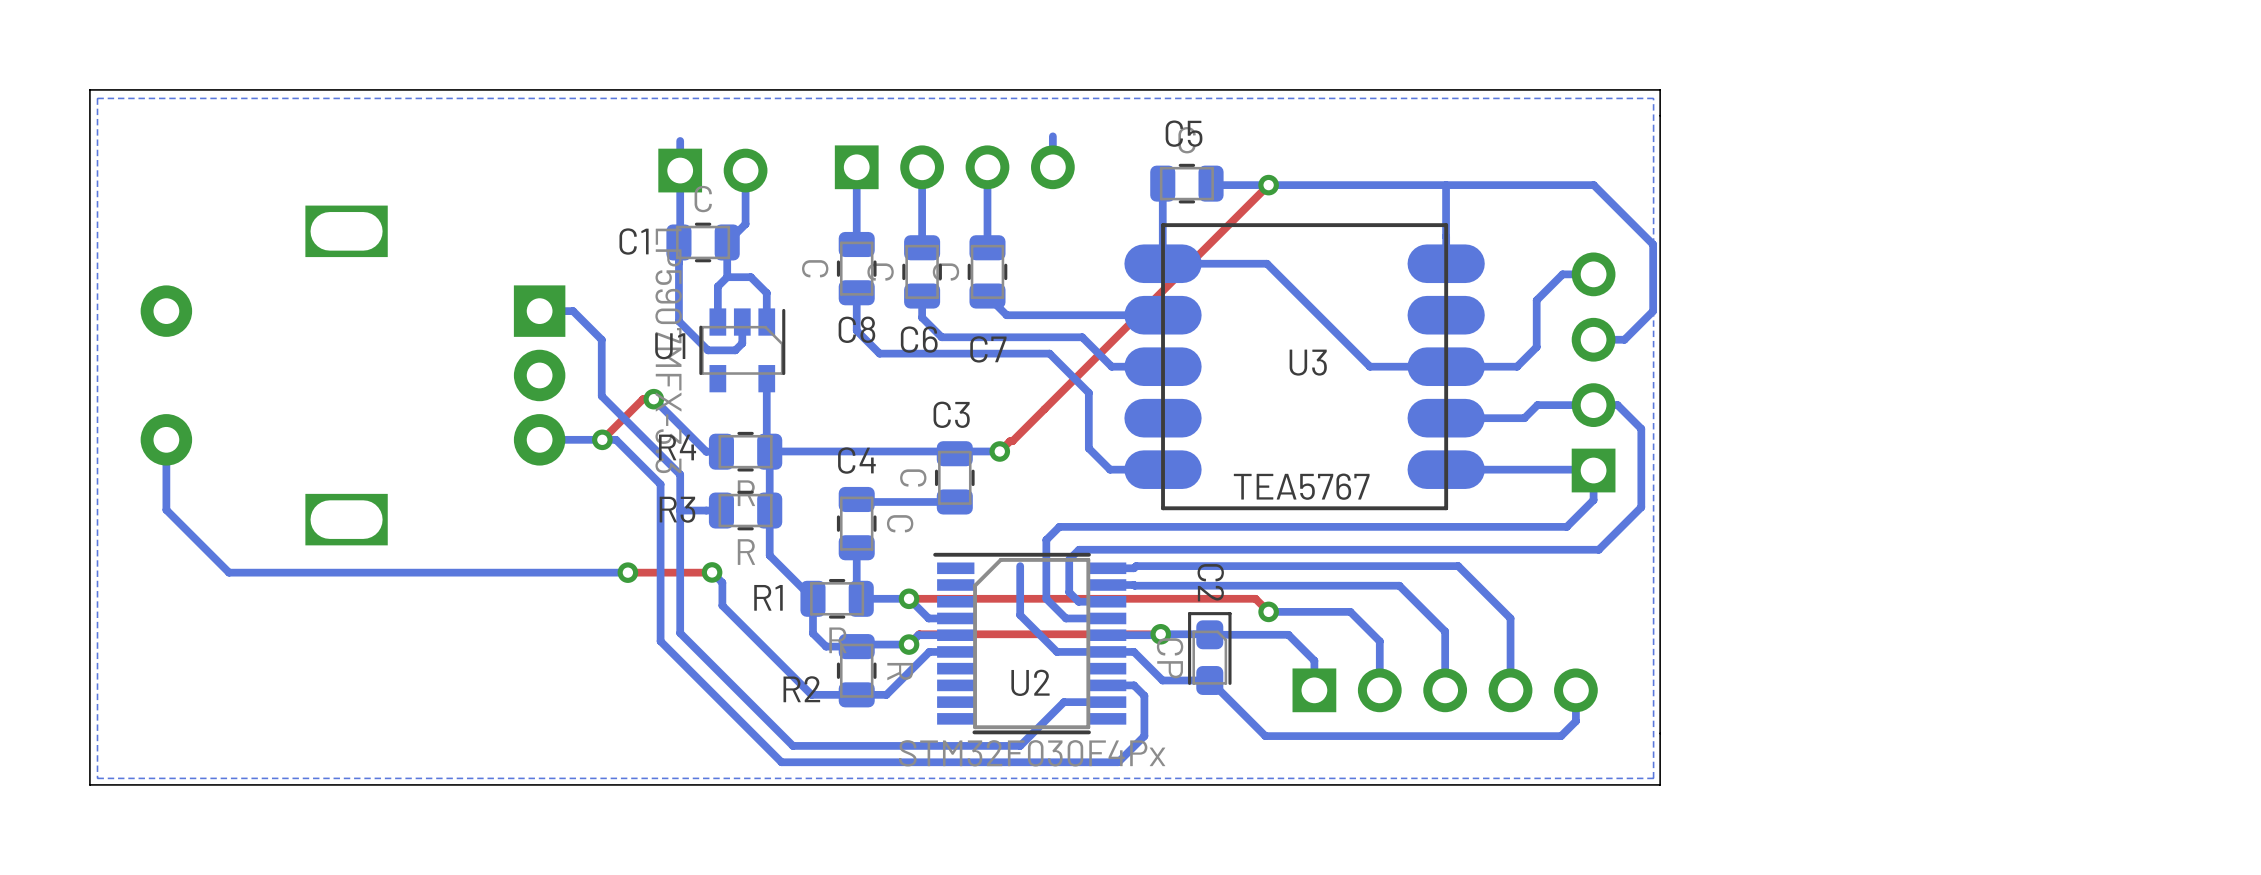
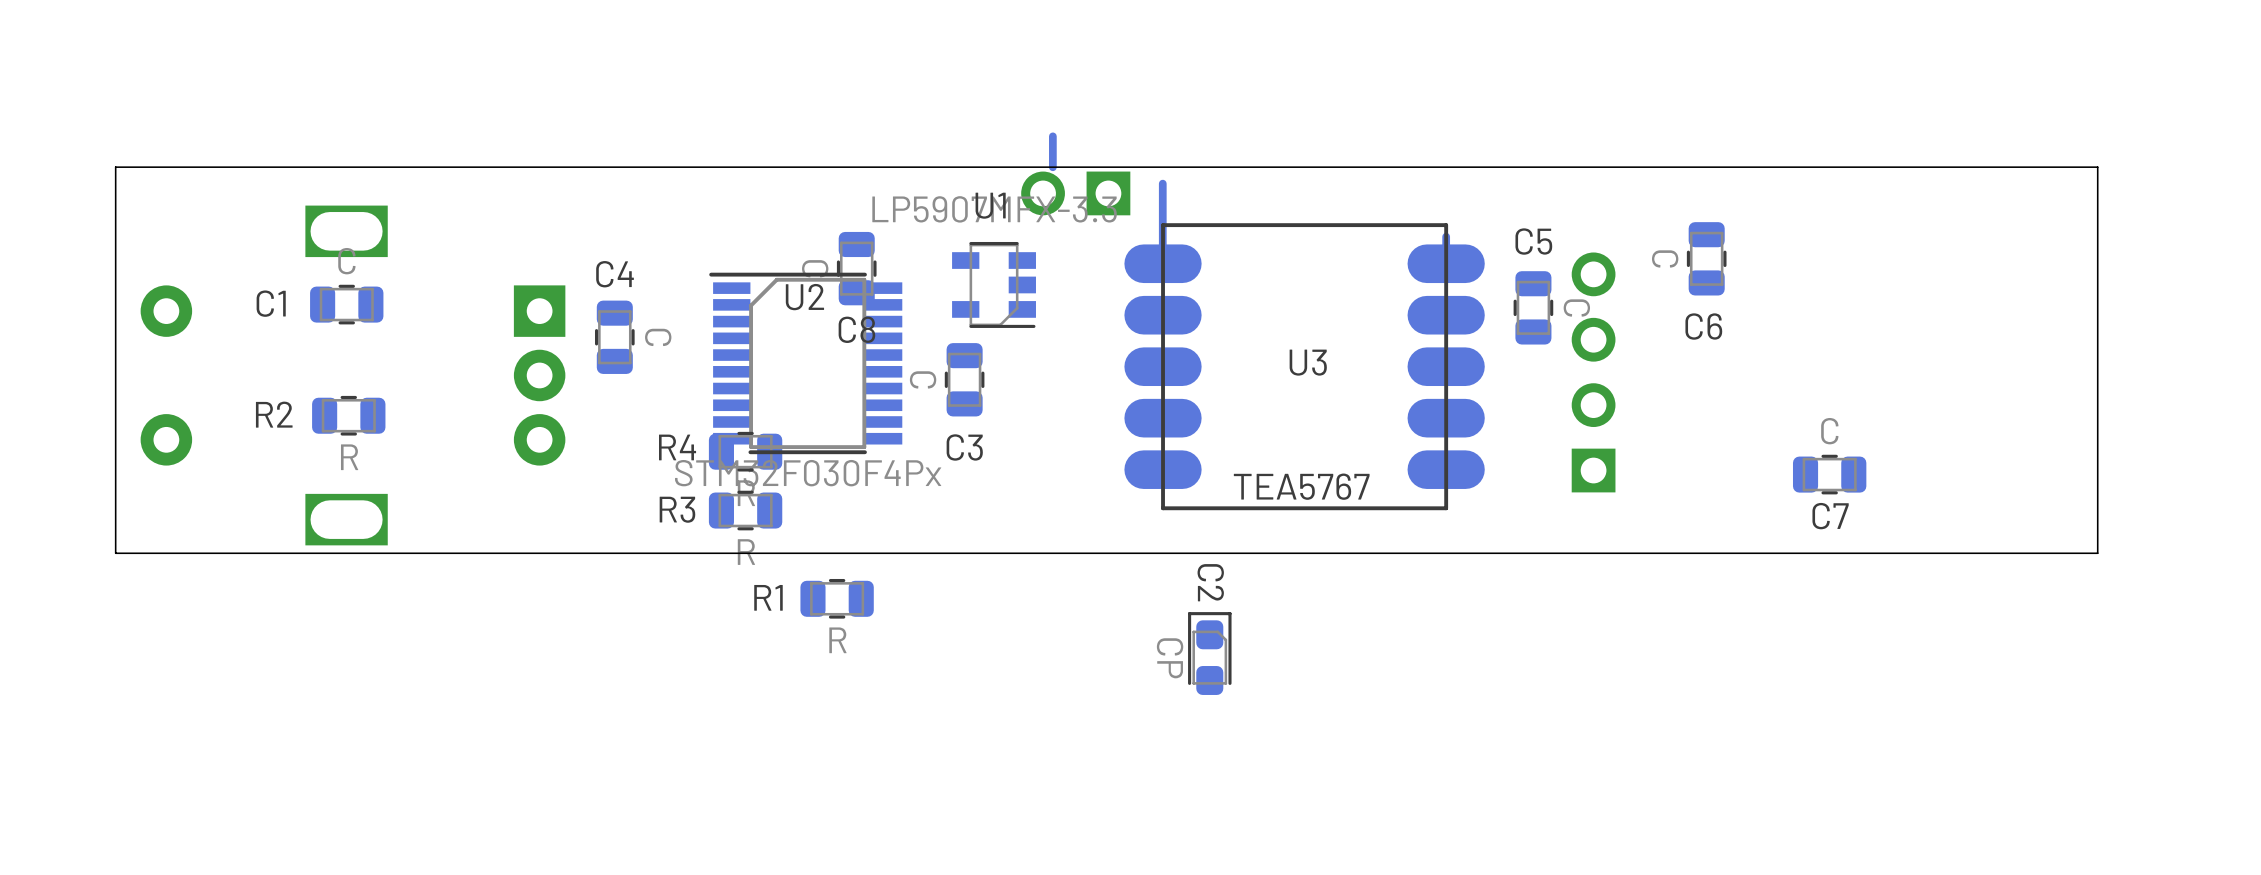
board edge: (1660, 89) (1660, 784) (89, 784) (89, 89) (1660, 89) -> none
bottom zone outline: (1653, 98) (1653, 778) (97, 778) (97, 98) (1653, 98) -> none
bottom track: (680, 140) (678, 321) (707, 350) (735, 350) (742, 343) (742, 322) -> none
bottom track: (856, 167) (856, 244) -> none
bottom track: (922, 167) (922, 247) -> none
part: (954, 167) -> none
bottom track: (987, 167) (987, 247) -> none
board edge: none -> (2097, 167) (2097, 553) (115, 553) (115, 167) (2097, 167)
part rotation: 0° (712, 170) -> 180° (1075, 193)
part position: (712, 170) -> (1075, 193)
bottom track: (745, 170) (745, 224) (727, 242) (727, 277) -> none
C5 rotation: 0° (1186, 183) -> 90° clockwise (1533, 307)
C5 position: (1186, 183) -> (1533, 307)
bottom track: (1211, 183) (1593, 185) (1653, 244) (1653, 311) (1624, 339) (1593, 339) -> none
top track: (1268, 185) (1012, 441) (1010, 441) (999, 451) -> none
via: (1268, 185) -> none
bottom track: (1446, 185) (1446, 236) -> none
C1 name position: C1 (634, 241) -> C1 (271, 303)
C1 position: (703, 242) -> (346, 304)
bottom track: (1163, 263) (1267, 263) (1369, 366) (1517, 366) (1536, 347) (1536, 300) (1562, 274) (1593, 274) -> none
C6 position: (922, 271) -> (1706, 258)
C7 rotation: 0° (987, 271) -> 90° clockwise (1829, 474)
C7 position: (987, 271) -> (1829, 474)
bottom track: (727, 277) (717, 286) (717, 322) -> none
bottom track: (727, 277) (750, 277) (766, 293) (766, 322) -> none
bottom track: (856, 292) (856, 330) (879, 353) (1049, 353) (1088, 392) (1088, 448) (1110, 469) (1163, 469) -> none
bottom track: (922, 296) (922, 317) (941, 337) (1082, 337) (1111, 366) (1182, 366) -> none
bottom track: (987, 296) (1006, 315) (1182, 315) -> none
bottom track: (539, 311) (573, 311) (601, 339) (601, 396) (680, 474) (680, 633) (792, 745) (1020, 745) (1063, 702) (1107, 702) -> none
U1 rotation: 0° (742, 350) -> 90° clockwise (994, 284)
U1 position: (742, 350) -> (994, 284)
bottom track: (766, 378) (766, 448) (771, 453) -> none
bottom track: (653, 399) (706, 451) (721, 451) -> none
top track: (653, 399) (643, 399) (602, 439) -> none
via: (653, 399) -> none
C3 name position: C3 (951, 414) -> C3 (964, 447)
bottom track: (1446, 418) (1524, 418) (1537, 405) (1617, 405) (1641, 428) (1641, 507) (1598, 549) (1079, 549) (1069, 559) (1069, 592) (1078, 601) (1107, 601) -> none
bottom track: (166, 439) (166, 509) (229, 572) (627, 572) -> none
bottom track: (539, 439) (616, 439) (660, 484) (660, 641) (781, 762) (1118, 762) (1144, 736) (1144, 695) (1134, 685) (1107, 685) -> none
via: (602, 439) -> none
bottom track: (769, 451) (769, 555) (812, 598) (812, 633) (826, 646) (909, 644) (918, 635) (955, 635) -> none
bottom track: (999, 451) (769, 451) -> none
via: (999, 451) -> none
bottom track: (1447, 470) (1592, 469) (1593, 500) (1566, 526) (1059, 526) (1046, 539) (1046, 598) (1066, 618) (1107, 618) -> none
C3 position: (954, 477) -> (964, 379)
bottom track: (856, 499) (859, 501) (954, 501) -> none
bottom track: (721, 510) (680, 510) -> none
C4 position: (856, 523) -> (614, 337)
bottom track: (856, 547) (856, 594) (861, 598) (909, 598) (928, 618) (955, 618) -> none
bottom track: (1020, 566) (1020, 615) (1056, 651) (1134, 651) (1162, 680) (1209, 680) (1265, 736) (1561, 736) (1575, 721) (1575, 690) -> none
bottom track: (1107, 568) (1134, 568) (1136, 566) (1458, 566) (1510, 618) (1510, 690) -> none
via: (627, 572) -> none
top track: (711, 572) (627, 572) -> none
bottom track: (712, 572) (722, 582) (722, 605) (811, 694) (886, 694) (929, 651) (955, 651) -> none
via: (712, 572) -> none
bottom track: (1107, 585) (1399, 585) (1445, 631) (1445, 690) -> none
top track: (909, 598) (1255, 598) (1268, 611) -> none
via: (909, 598) -> none
bottom track: (1268, 611) (1350, 611) (1379, 641) (1379, 690) -> none
via: (1268, 611) -> none
top track: (1160, 634) (919, 634) (909, 644) -> none
via: (1160, 634) -> none
bottom track: (1107, 635) (1288, 634) (1314, 660) (1314, 690) -> none
U2 position: (1029, 643) -> (805, 363)
via: (909, 644) -> none
R2 rotation: 0° (856, 670) -> 90° clockwise (348, 415)
R2 position: (856, 670) -> (348, 415)
U2 name position: U2 (1030, 682) -> U2 (804, 297)
part: (1445, 690) -> none

